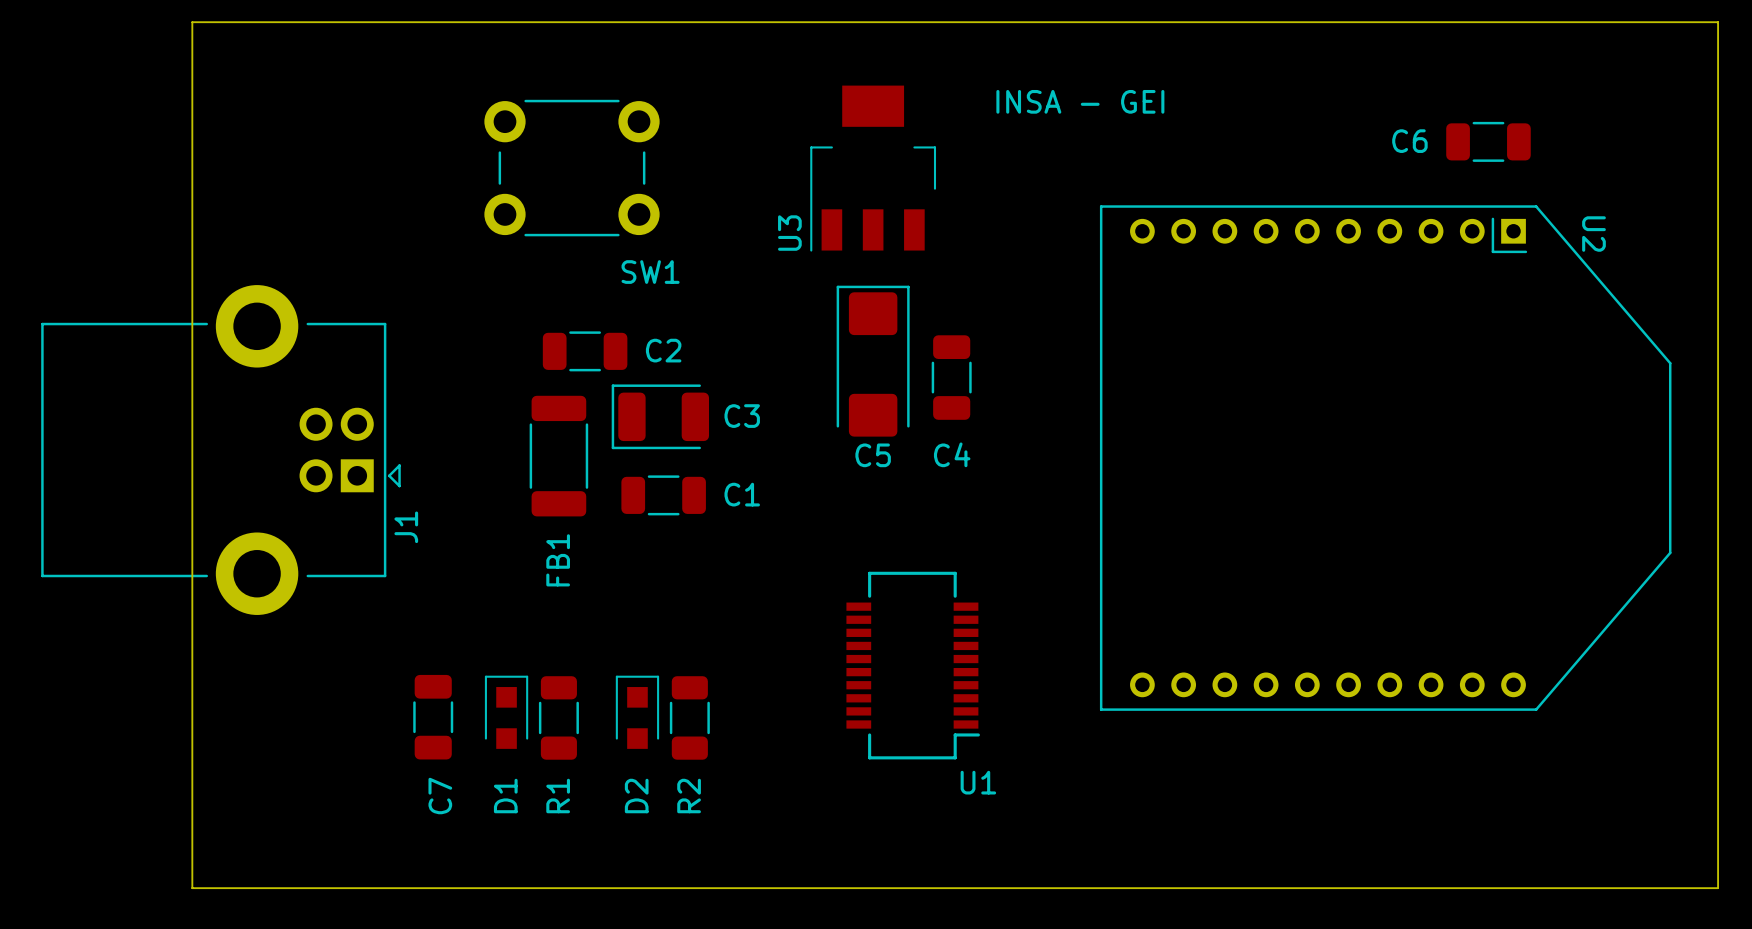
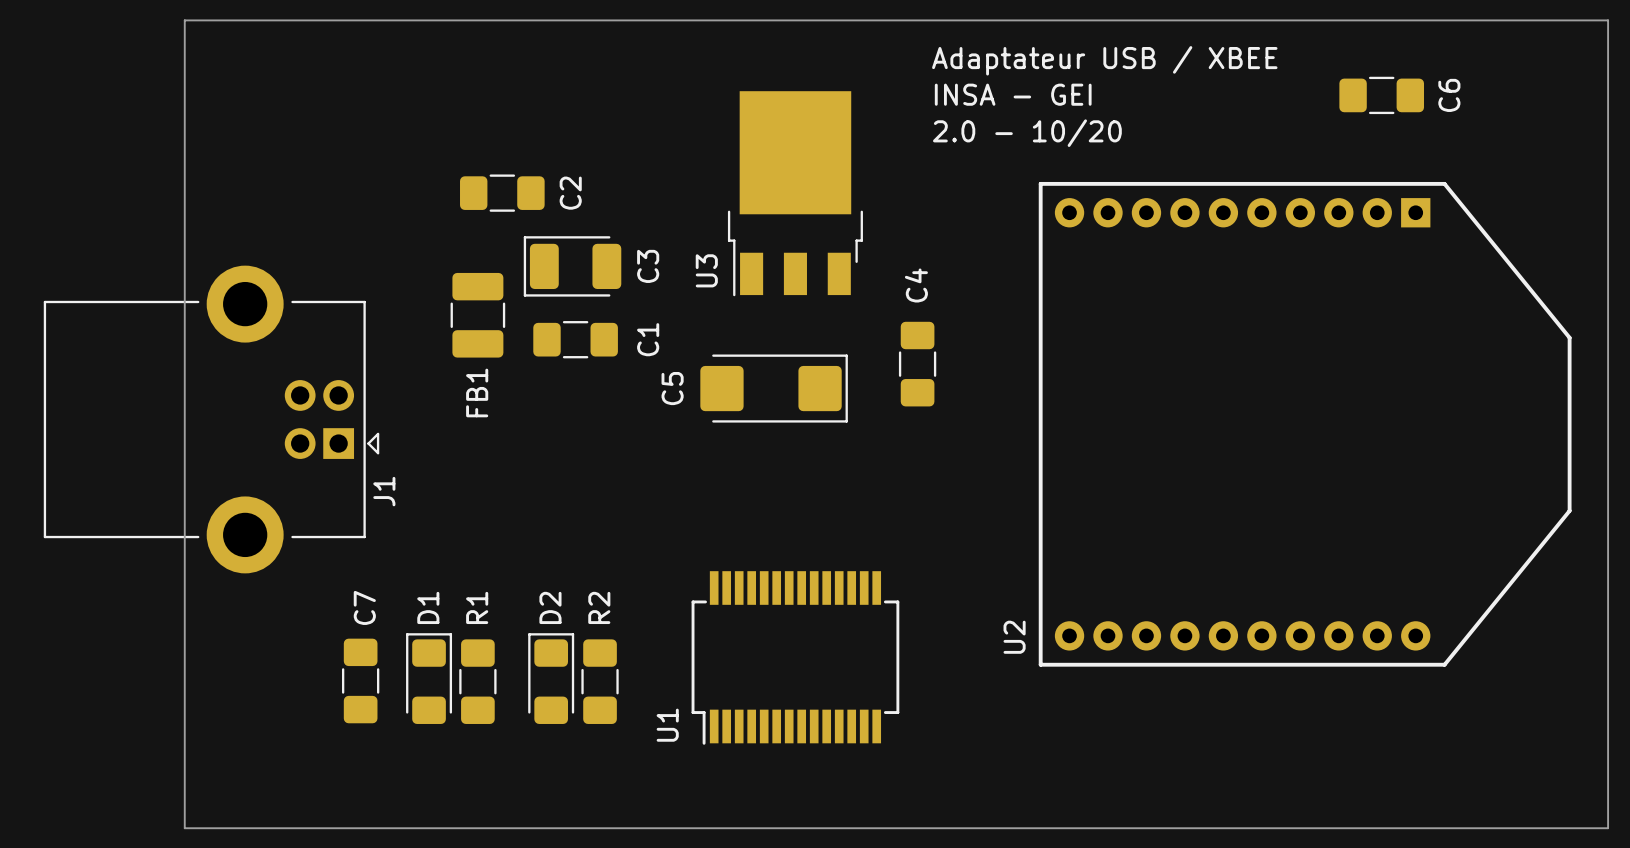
text: none -> Adaptateur USB / XBEE (1104, 60)
U3 footprint: [810, 85, 937, 252] -> [727, 91, 863, 297]
C6 footprint: [1446, 121, 1531, 162] -> [1339, 76, 1425, 115]
C6 name position: C6 (1409, 141) -> C6 (1449, 95)
text: none -> 2.0 - 10/20 (1027, 133)
SW1: (572, 168) -> none
U2 footprint: [1099, 205, 1672, 711] -> [1038, 181, 1572, 667]
U2 name position: U2 (1593, 234) -> U2 (1014, 637)
C5 footprint: [836, 285, 910, 437] -> [700, 354, 848, 423]
C2 footprint: [542, 331, 628, 372] -> [460, 174, 545, 212]
C4 footprint: [931, 335, 972, 420] -> [898, 321, 937, 407]
C3 footprint: [611, 384, 710, 450] -> [523, 236, 622, 297]
FB1 footprint: [529, 395, 589, 517] -> [450, 272, 506, 358]
C4 name position: C4 (952, 454) -> C4 (916, 285)
C5 name position: C5 (873, 455) -> C5 (672, 388)
C1 footprint: [621, 475, 706, 516] -> [533, 321, 618, 359]
U1 footprint: [846, 571, 980, 760] -> [691, 571, 900, 745]
C7 footprint: [413, 674, 454, 760] -> [341, 638, 380, 724]
D1 footprint: [484, 675, 529, 749] -> [406, 633, 453, 724]
D2 footprint: [615, 675, 660, 749] -> [528, 633, 575, 724]
R1 footprint: [538, 676, 579, 760] -> [459, 639, 497, 724]
R2 footprint: [669, 676, 710, 760] -> [581, 639, 619, 724]
U1 name position: U1 (978, 782) -> U1 (667, 725)
C7 name position: C7 (440, 796) -> C7 (364, 607)
D1 name position: D1 (505, 796) -> D1 (428, 607)
R1 name position: R1 (558, 796) -> R1 (477, 607)
D2 name position: D2 (636, 796) -> D2 (550, 607)
R2 name position: R2 (689, 796) -> R2 (599, 607)

